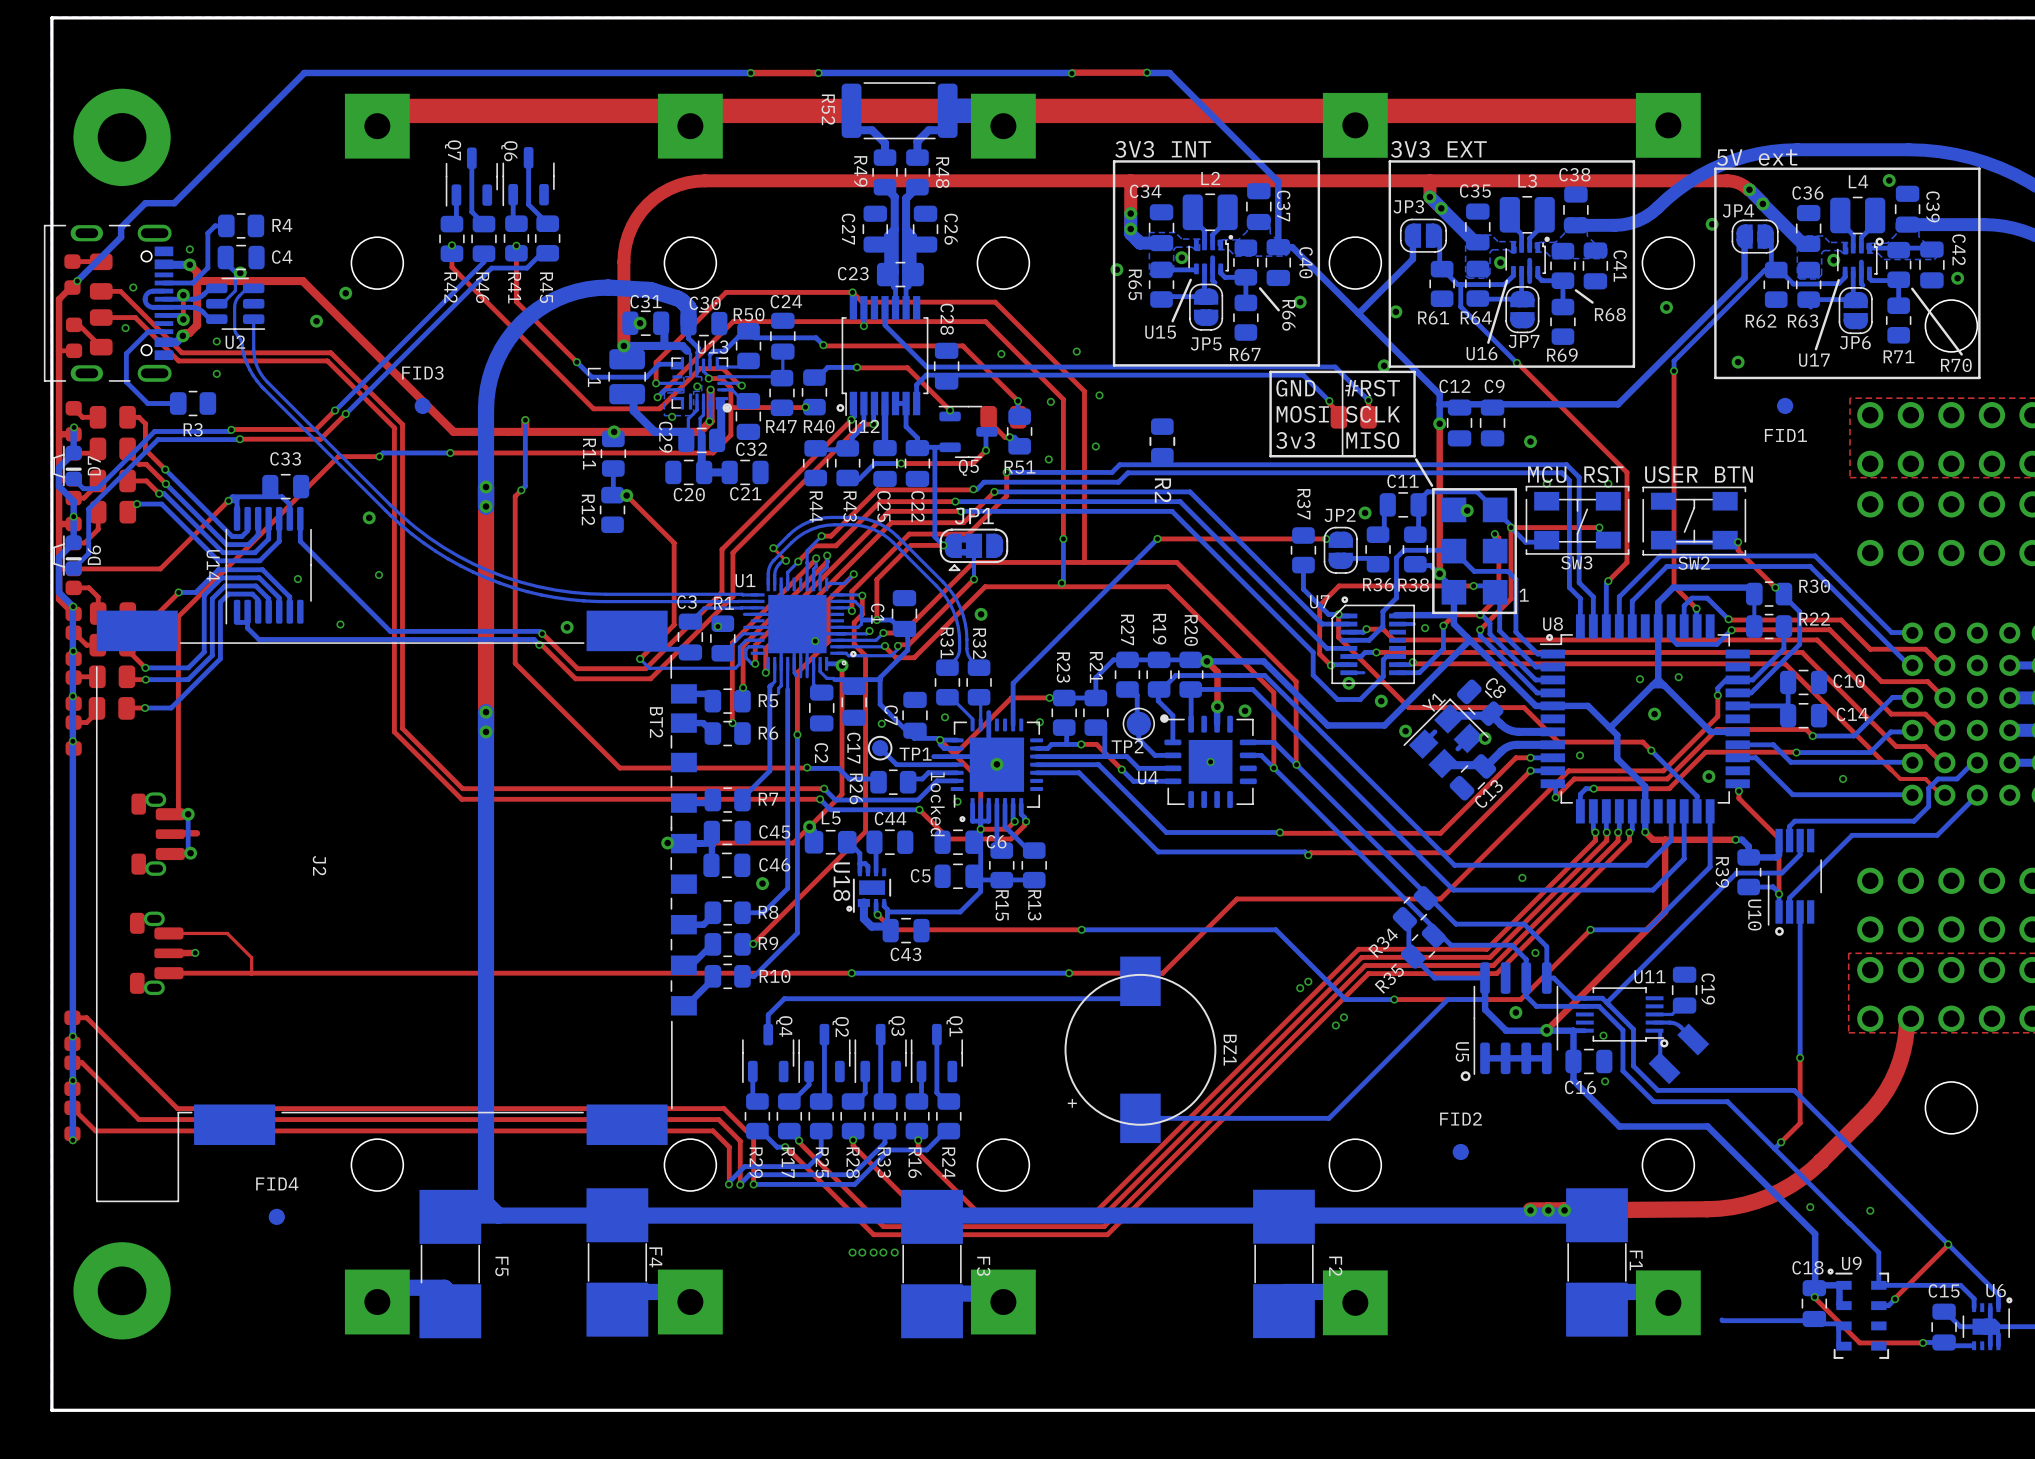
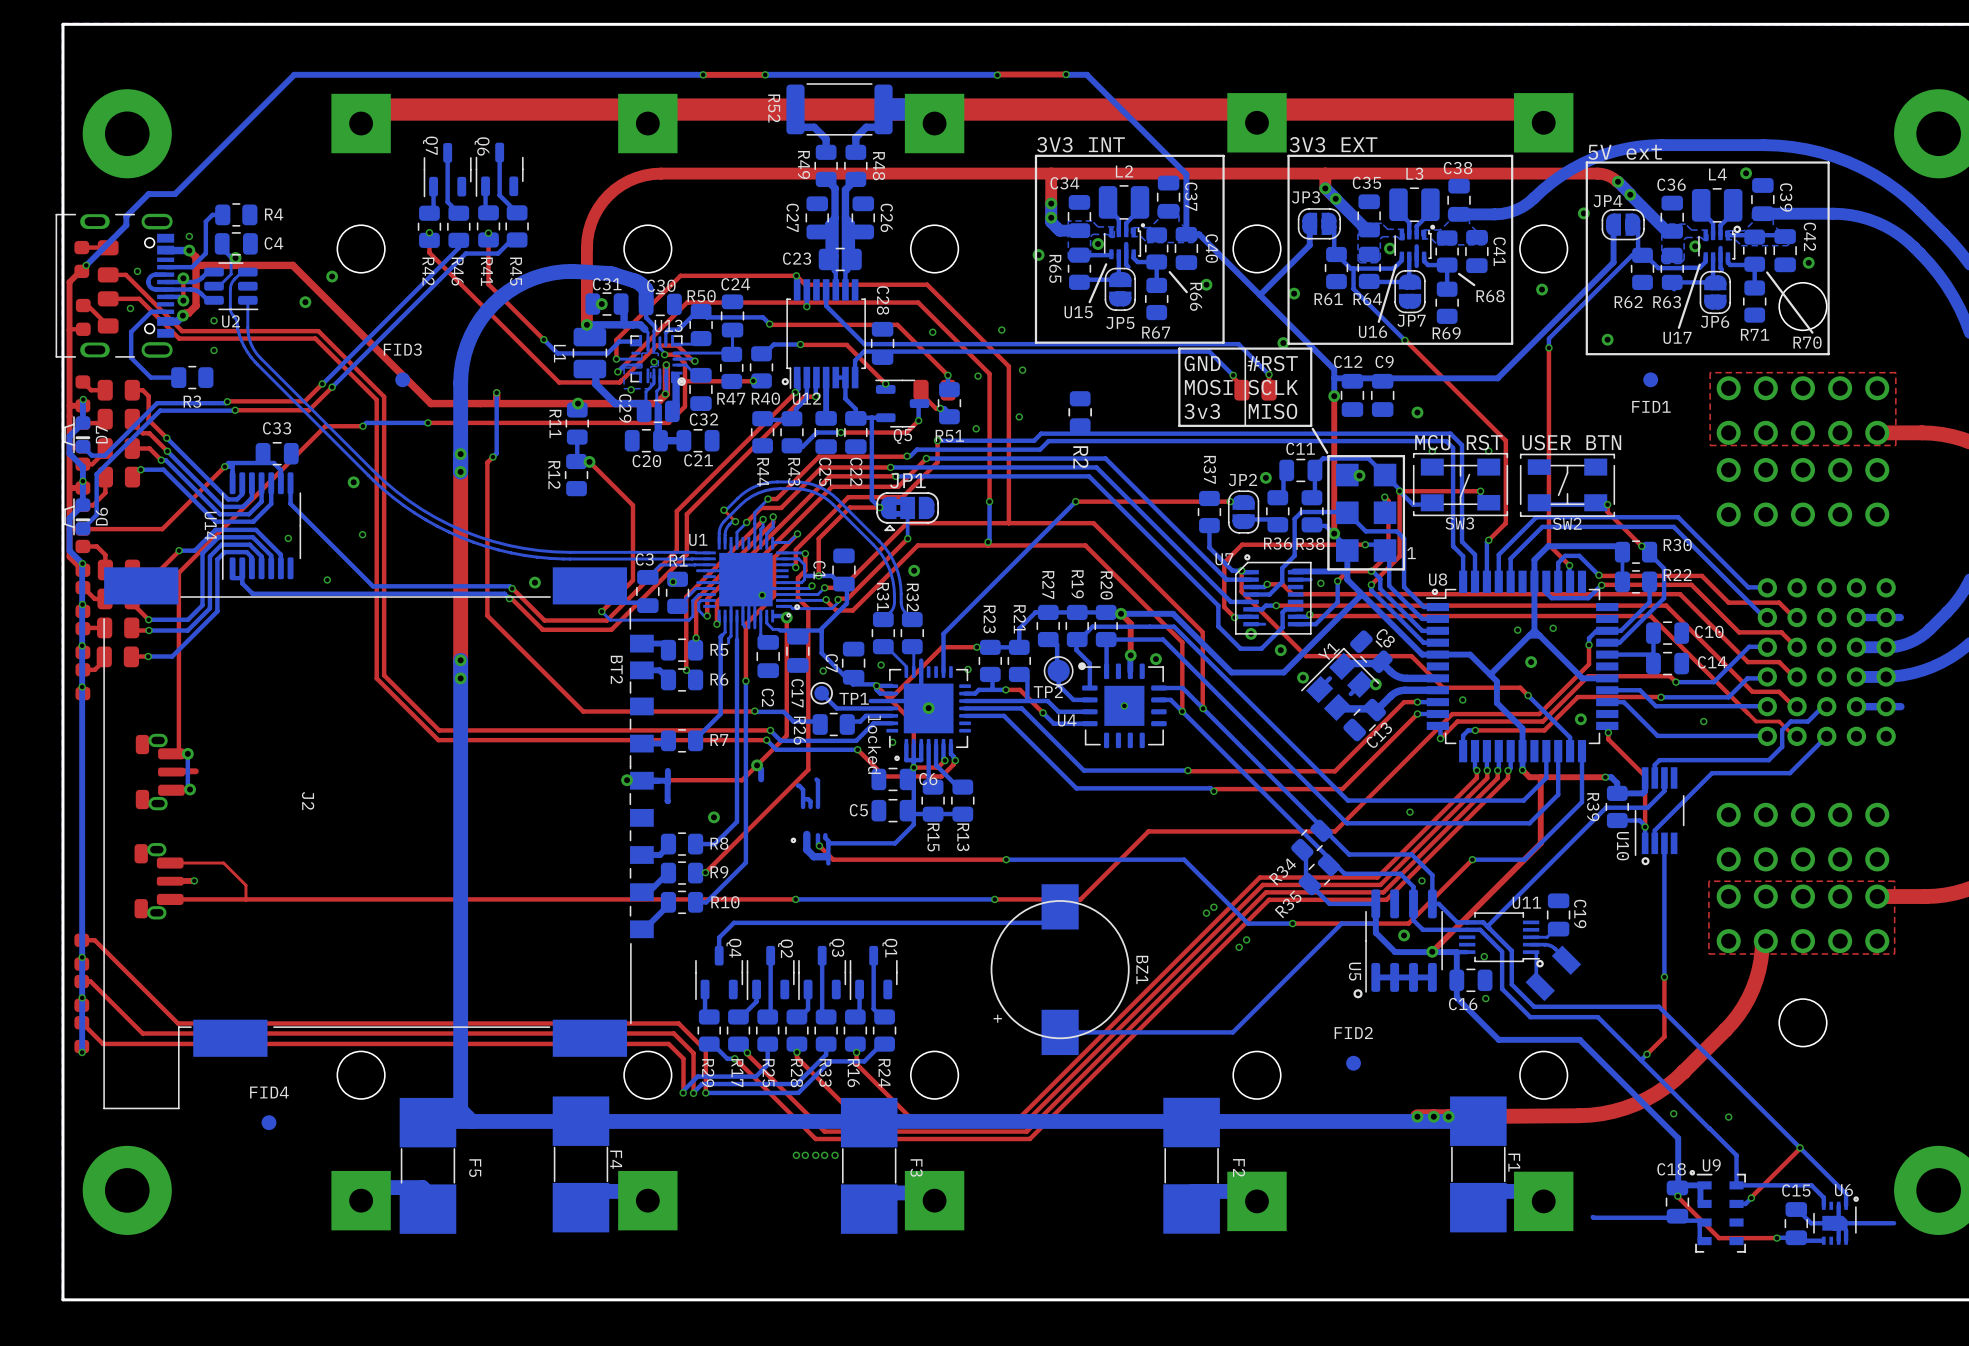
C45: (727, 832) -> none
L5: (830, 842) -> none
C44: (889, 842) -> none
C46: (726, 865) -> none
U18: (872, 890) -> none
C43: (906, 930) -> none

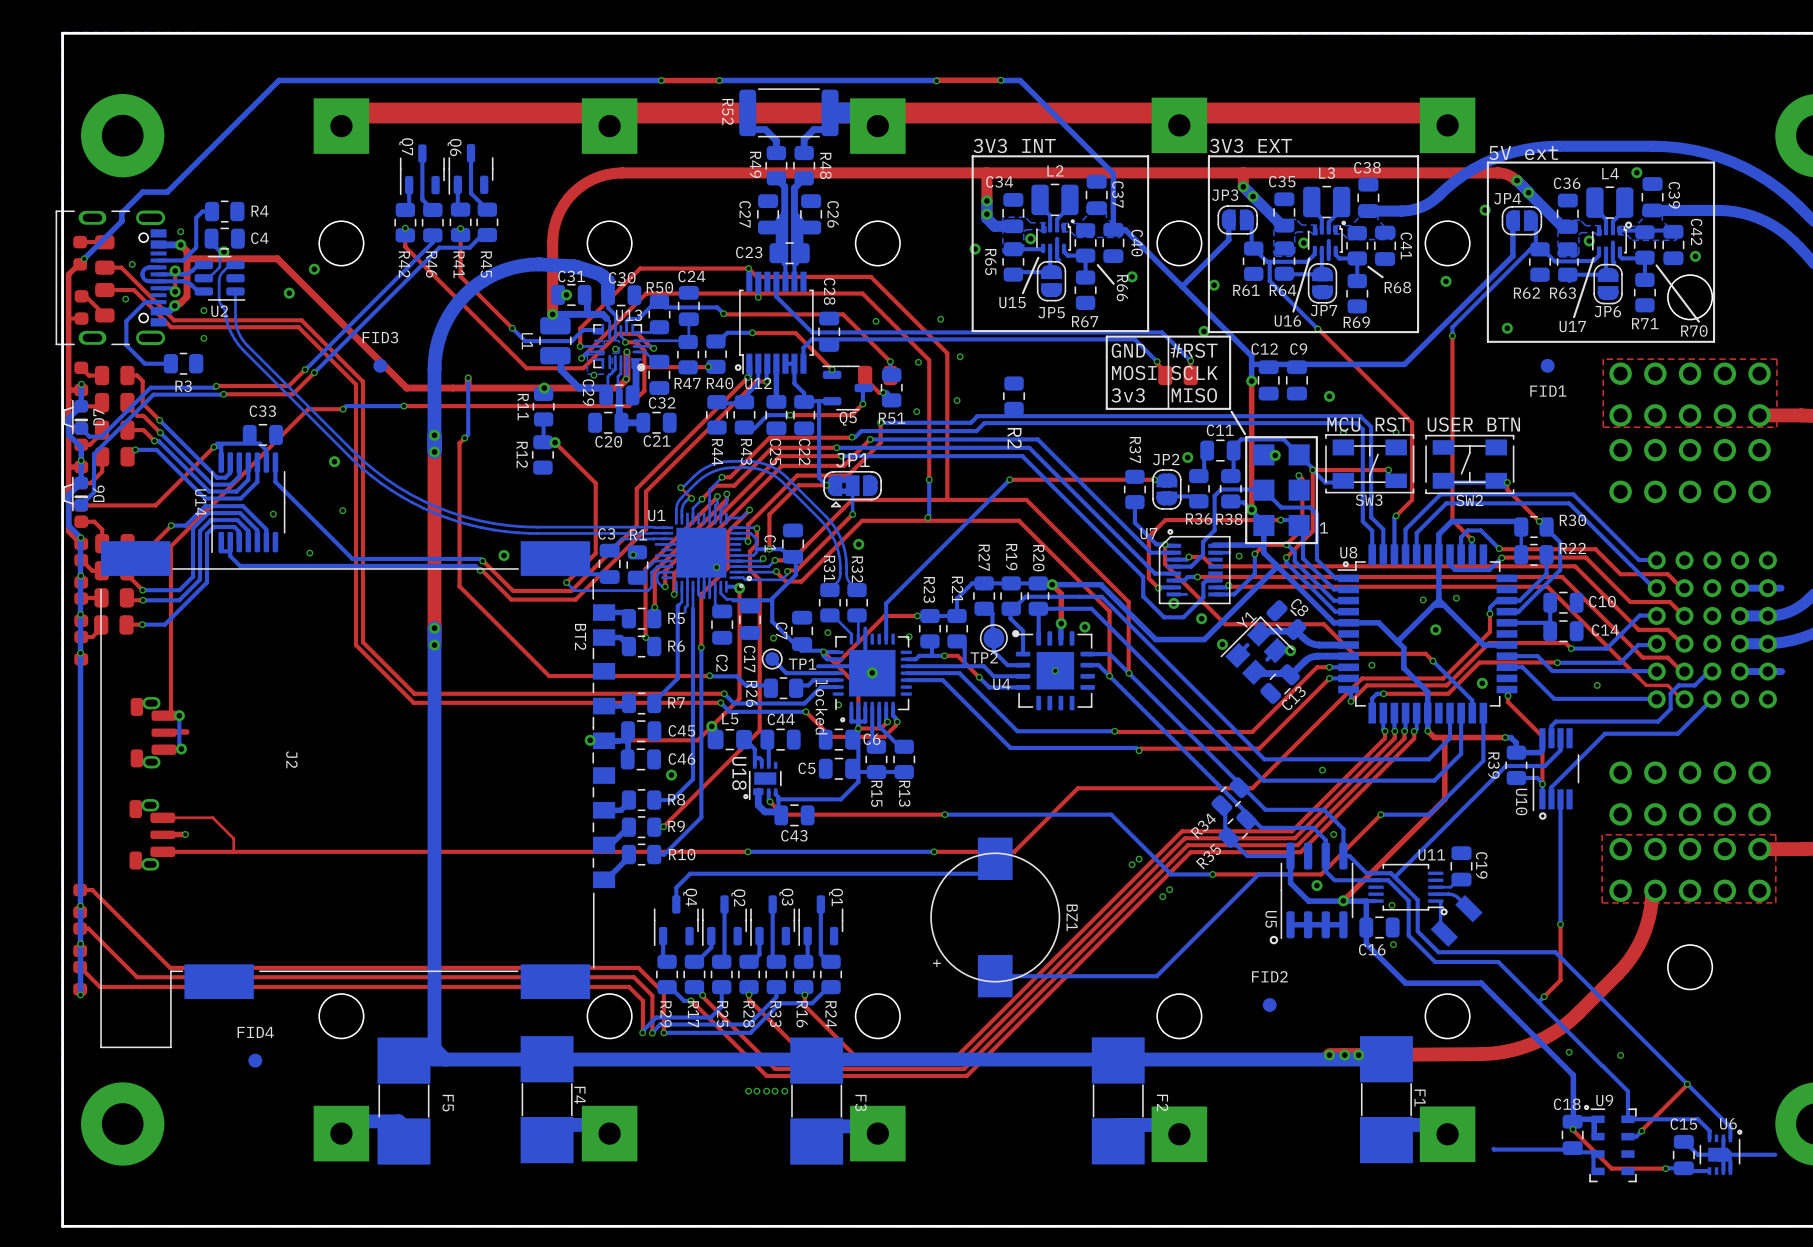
C45: none -> (641, 731)
L5: none -> (729, 739)
C44: none -> (780, 739)
C46: none -> (640, 759)
U18: none -> (765, 781)
C43: none -> (794, 815)

